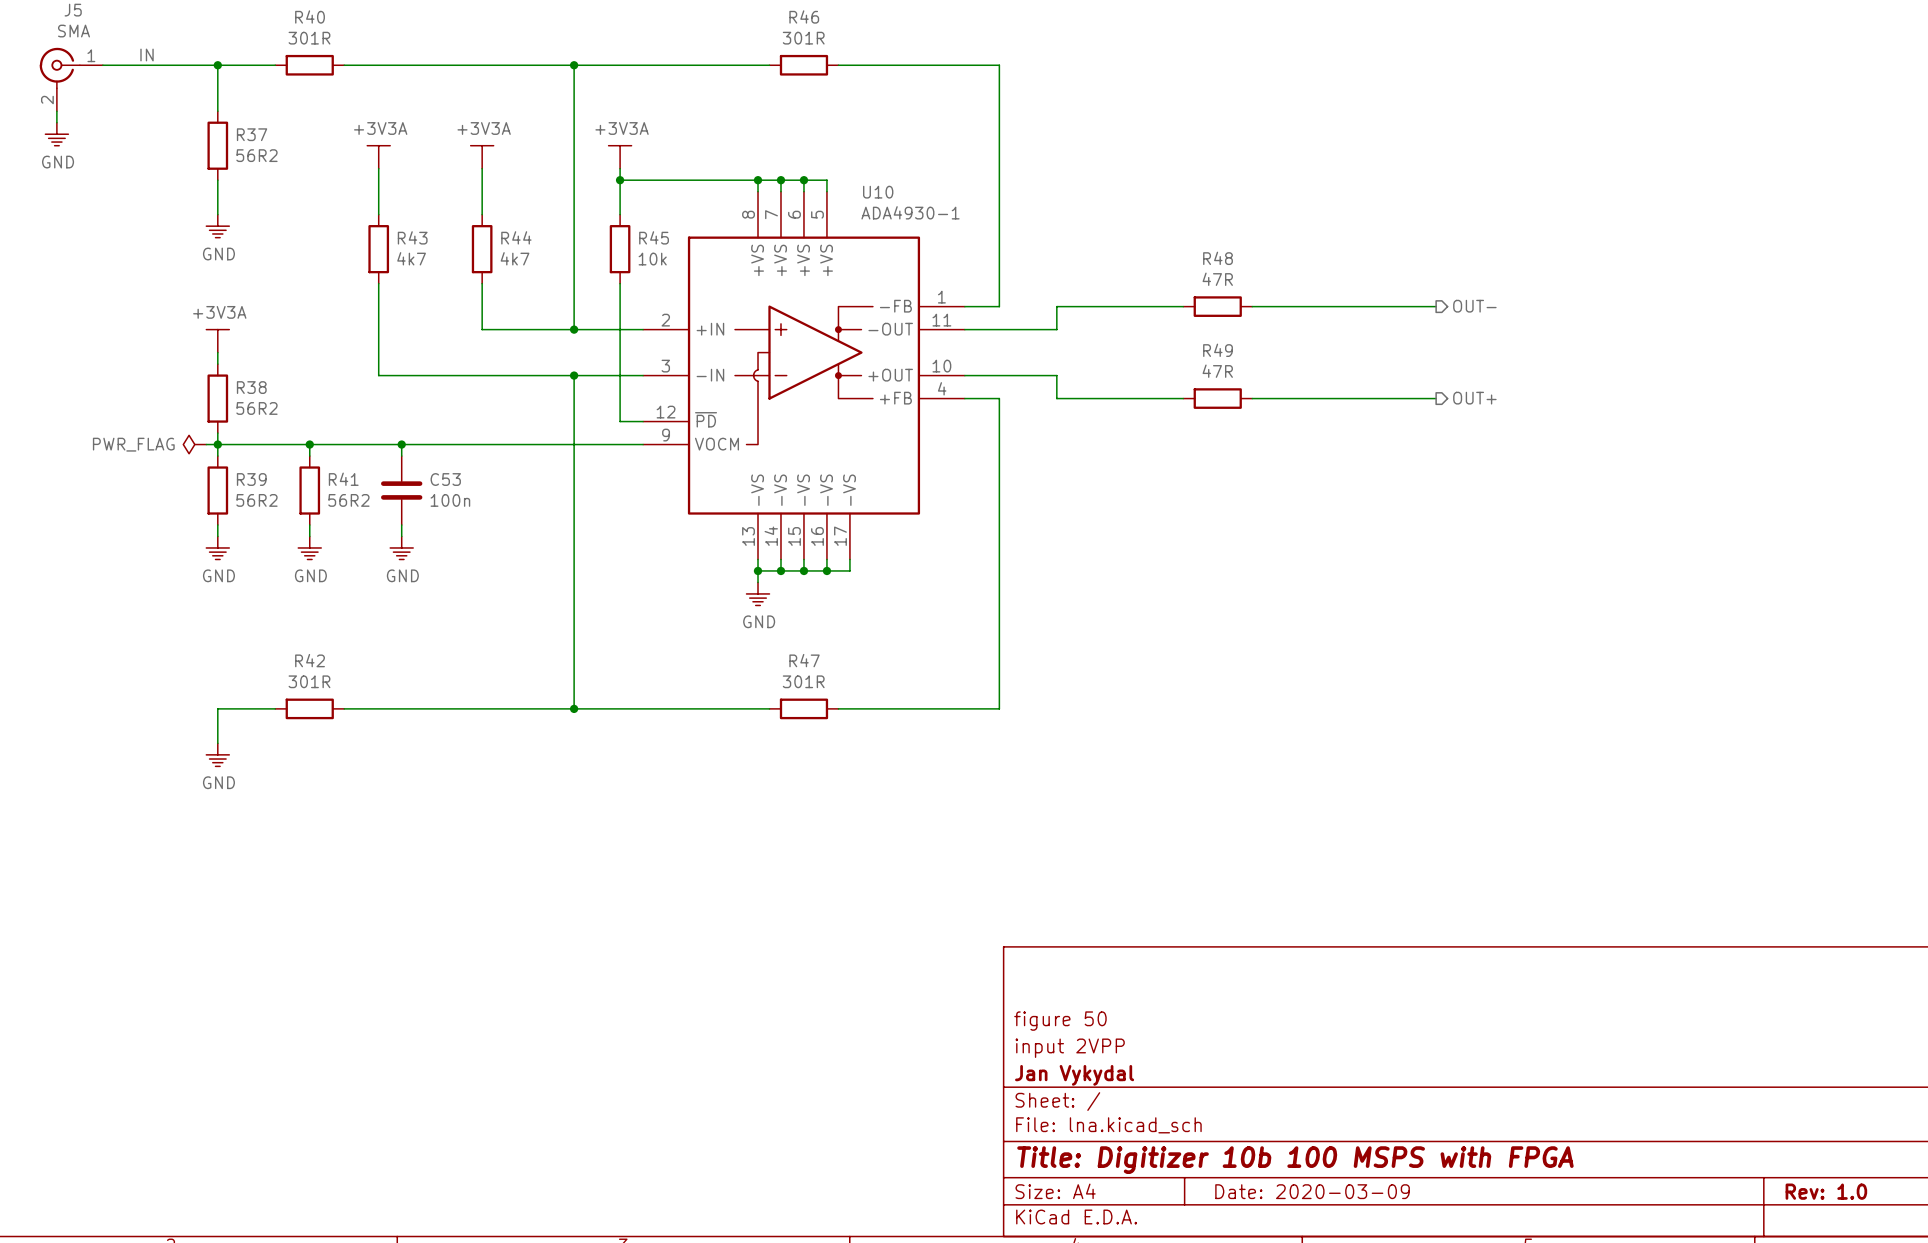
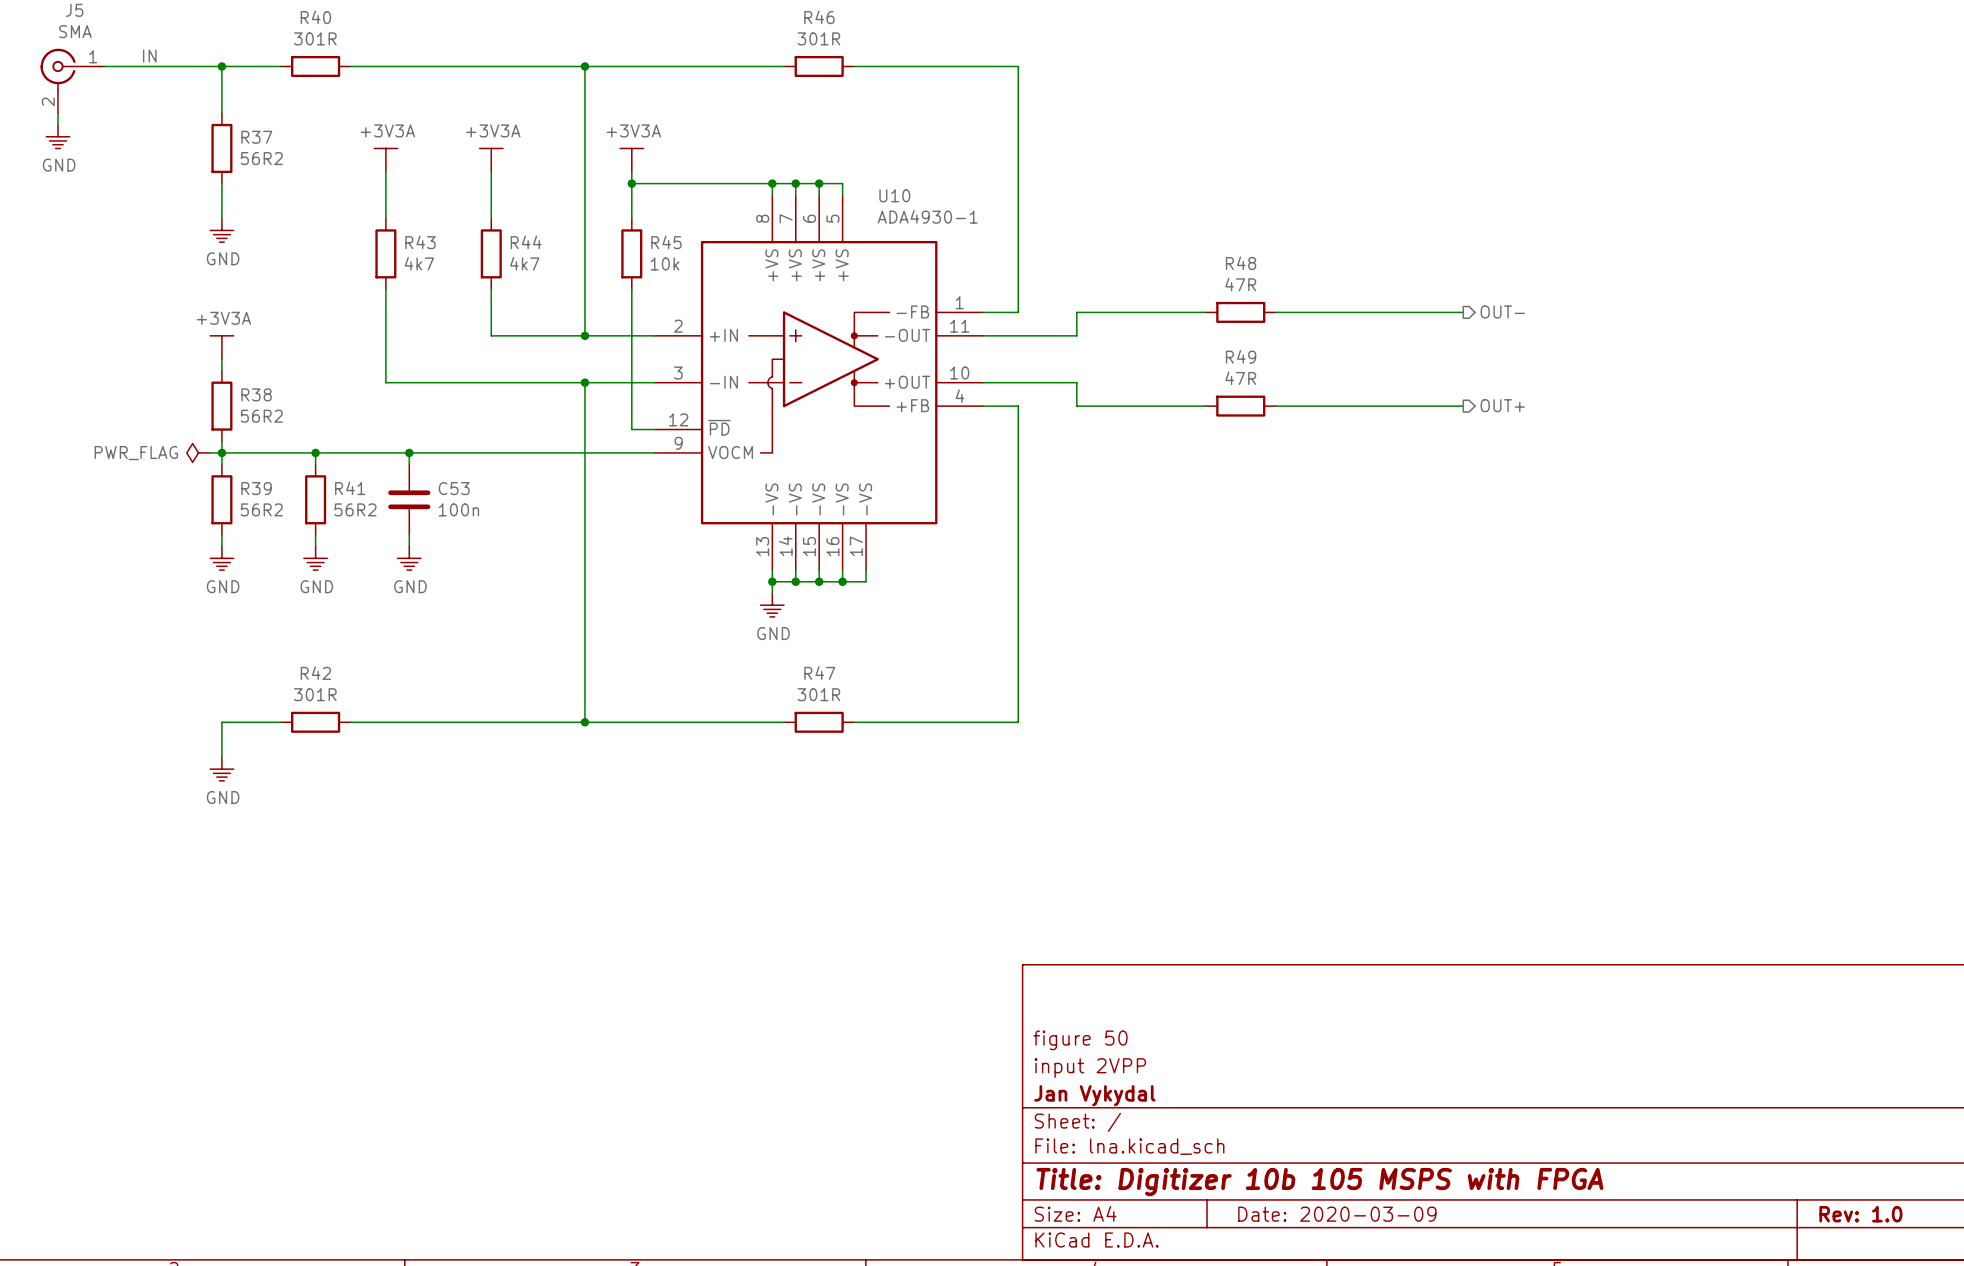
title block: Title: Digitizer 10b 100 MSPS with FPGA (1295, 1160) -> Title: Digitizer 10b 105 MSPS with FPGA (1319, 1182)

